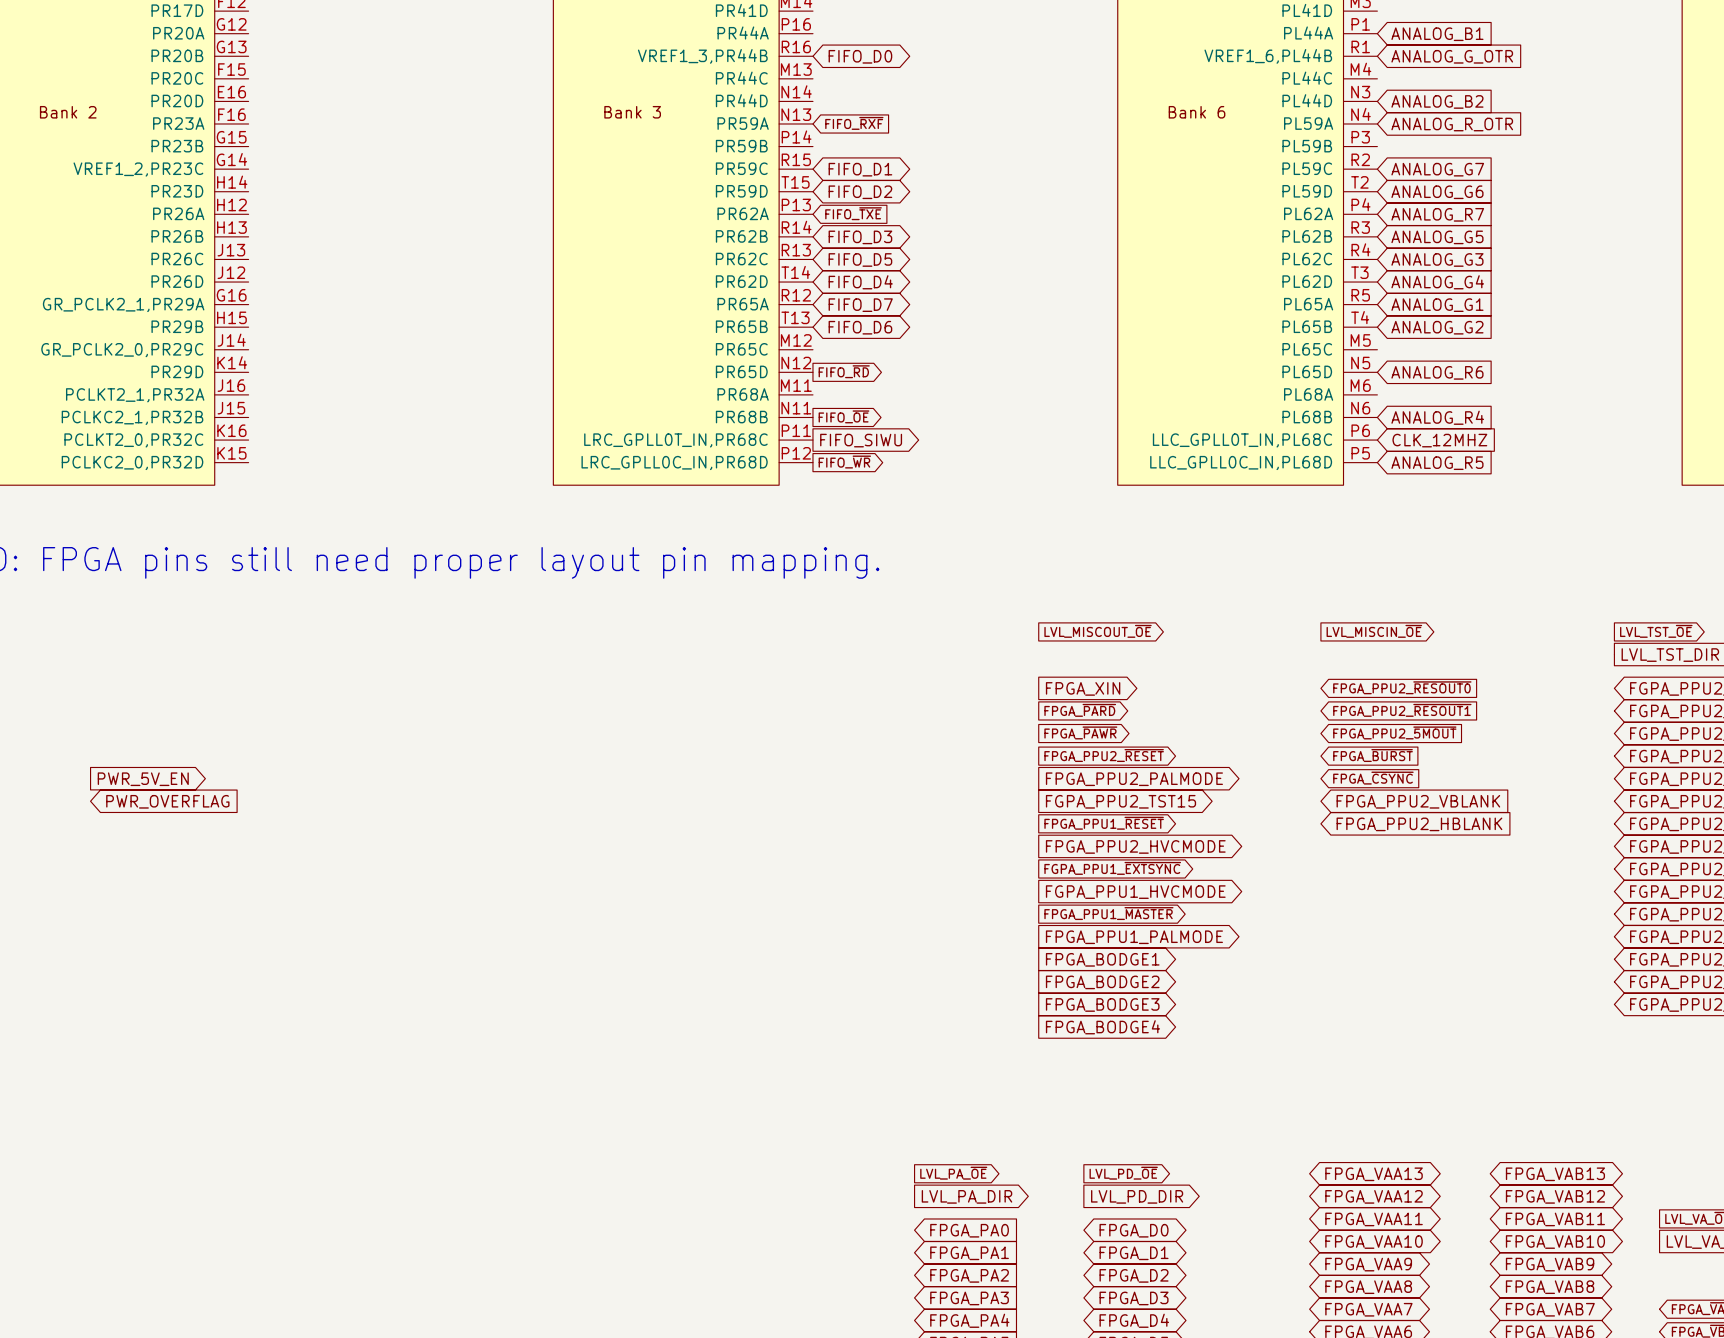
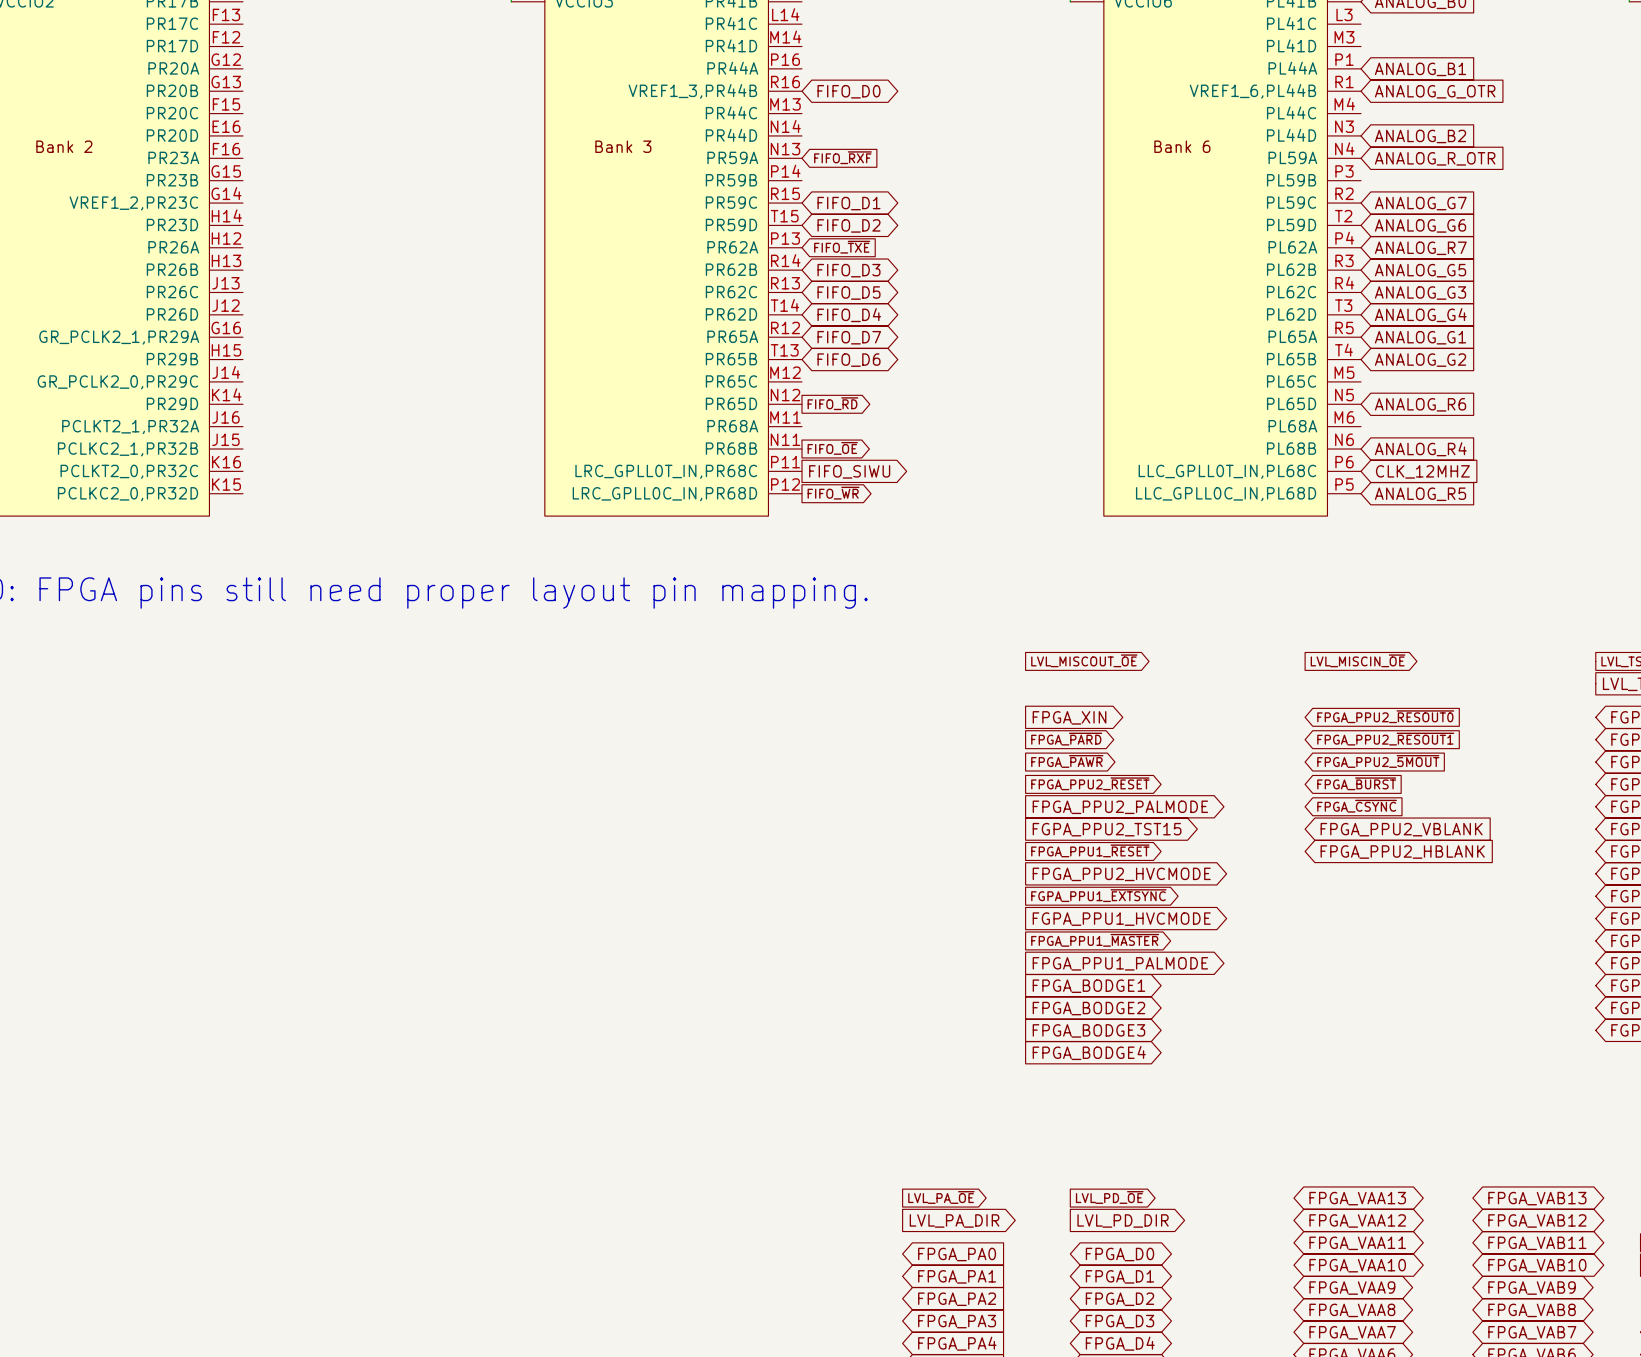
global label: PWR_5V_EN (143, 779) -> none
global label: PWR_OVERFLAG (167, 801) -> none

